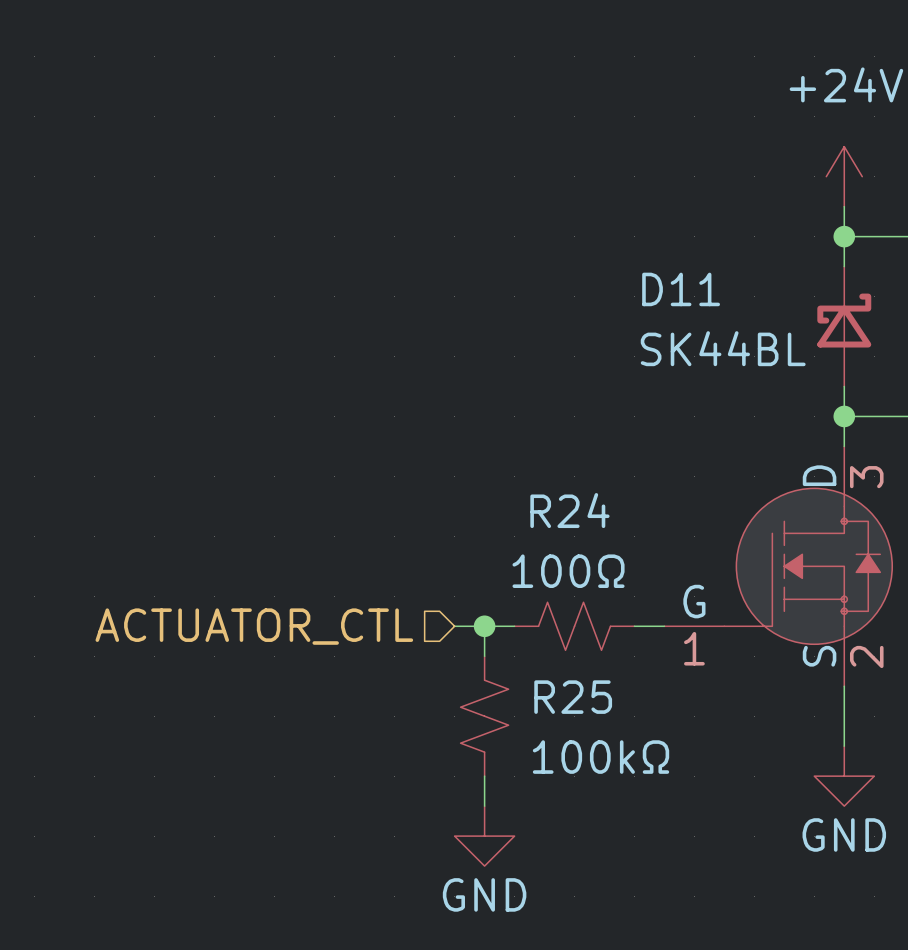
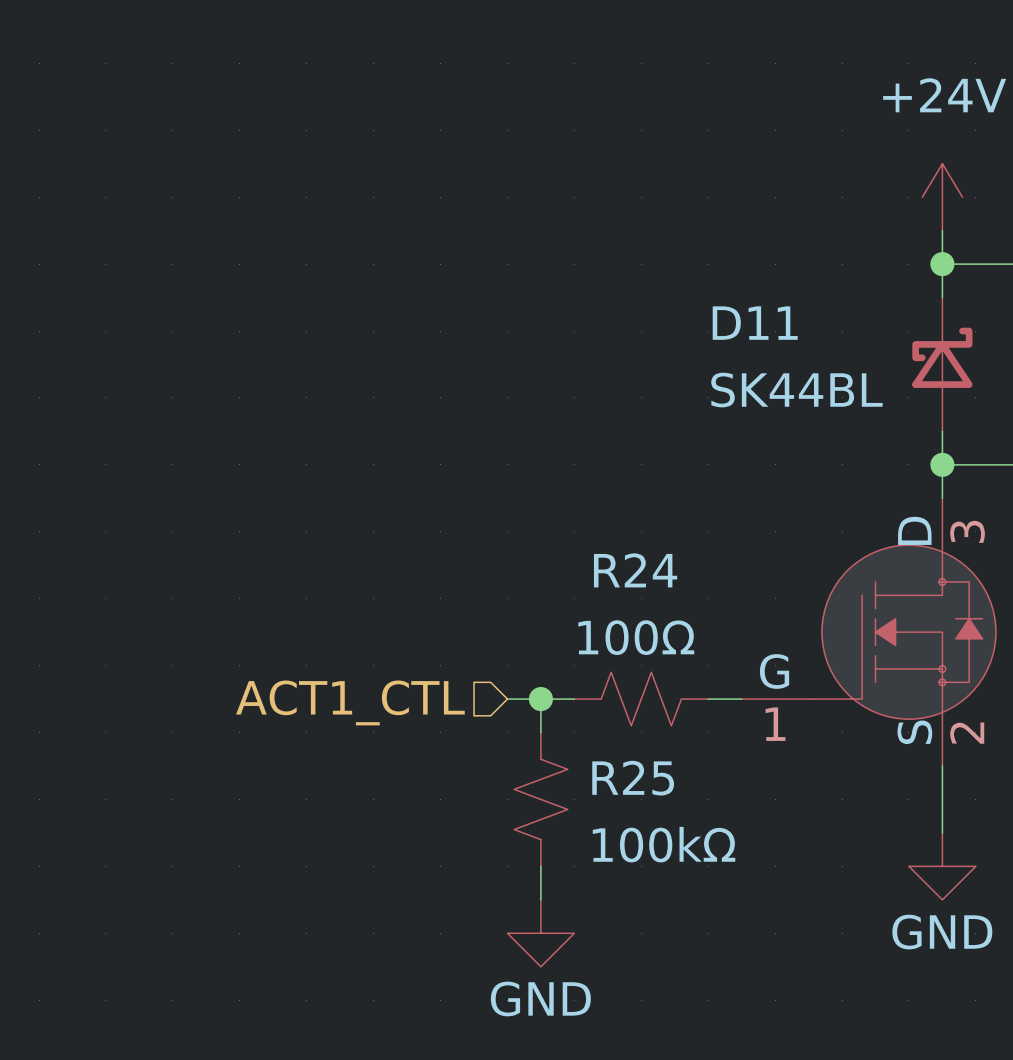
hierarchical label: ACTUATOR_CTL (254, 626) -> ACT1_CTL (350, 702)

